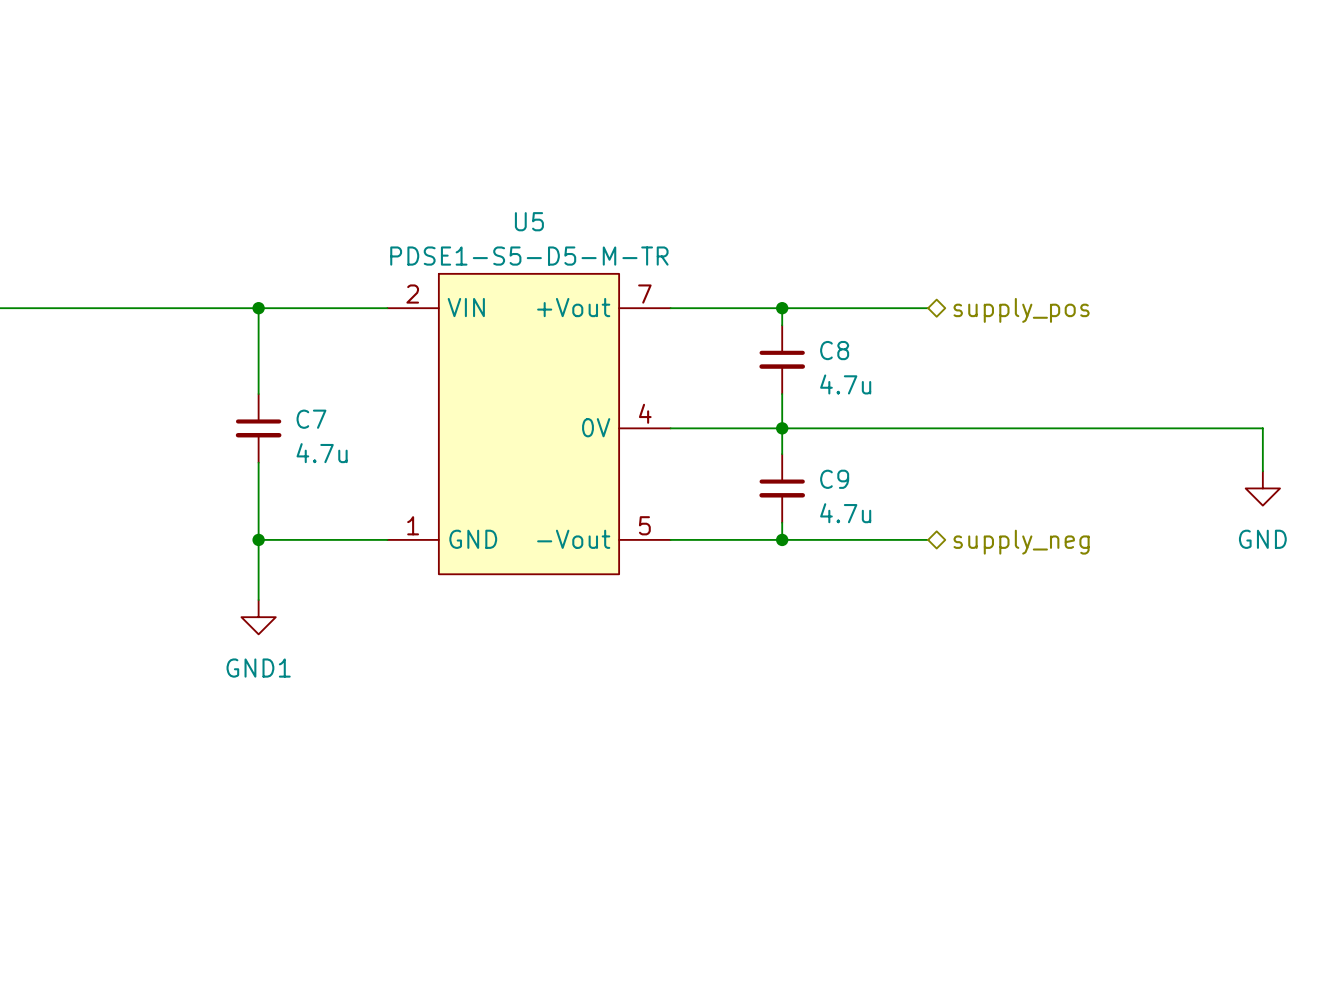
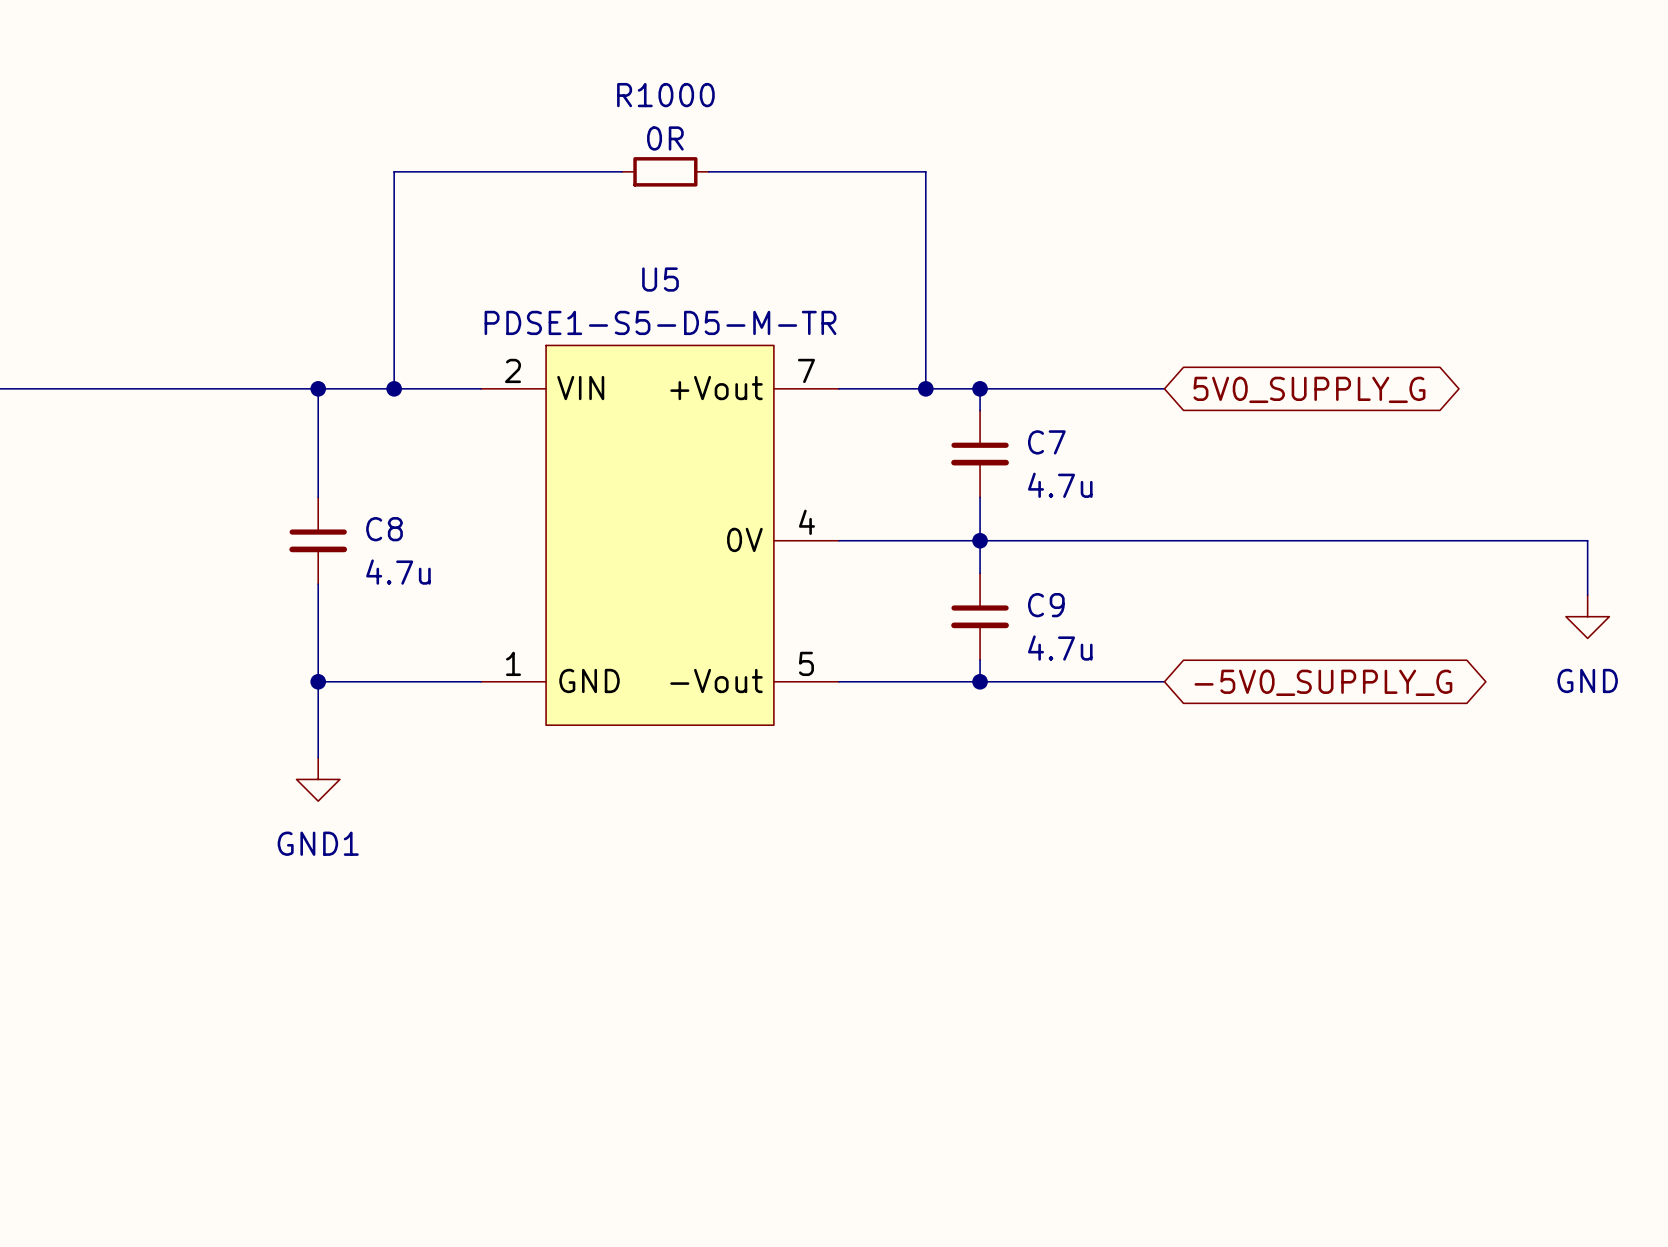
wire: none -> (622, 171) (394, 171) (394, 388)
R1000: none -> 0R (665, 171)
wire: none -> (708, 171) (925, 171) (925, 388)
junction: none -> (394, 388)
junction: none -> (925, 388)
global label: none -> 5V0_SUPPLY_G (1309, 389)
hierarchical label: supply_pos (1021, 310) -> none
C8 name: C8 (834, 350) -> C7 (1046, 442)
C7 name: C7 (311, 419) -> C8 (384, 529)
global label: none -> -5V0_SUPPLY_G (1323, 682)
hierarchical label: supply_neg (1021, 542) -> none

